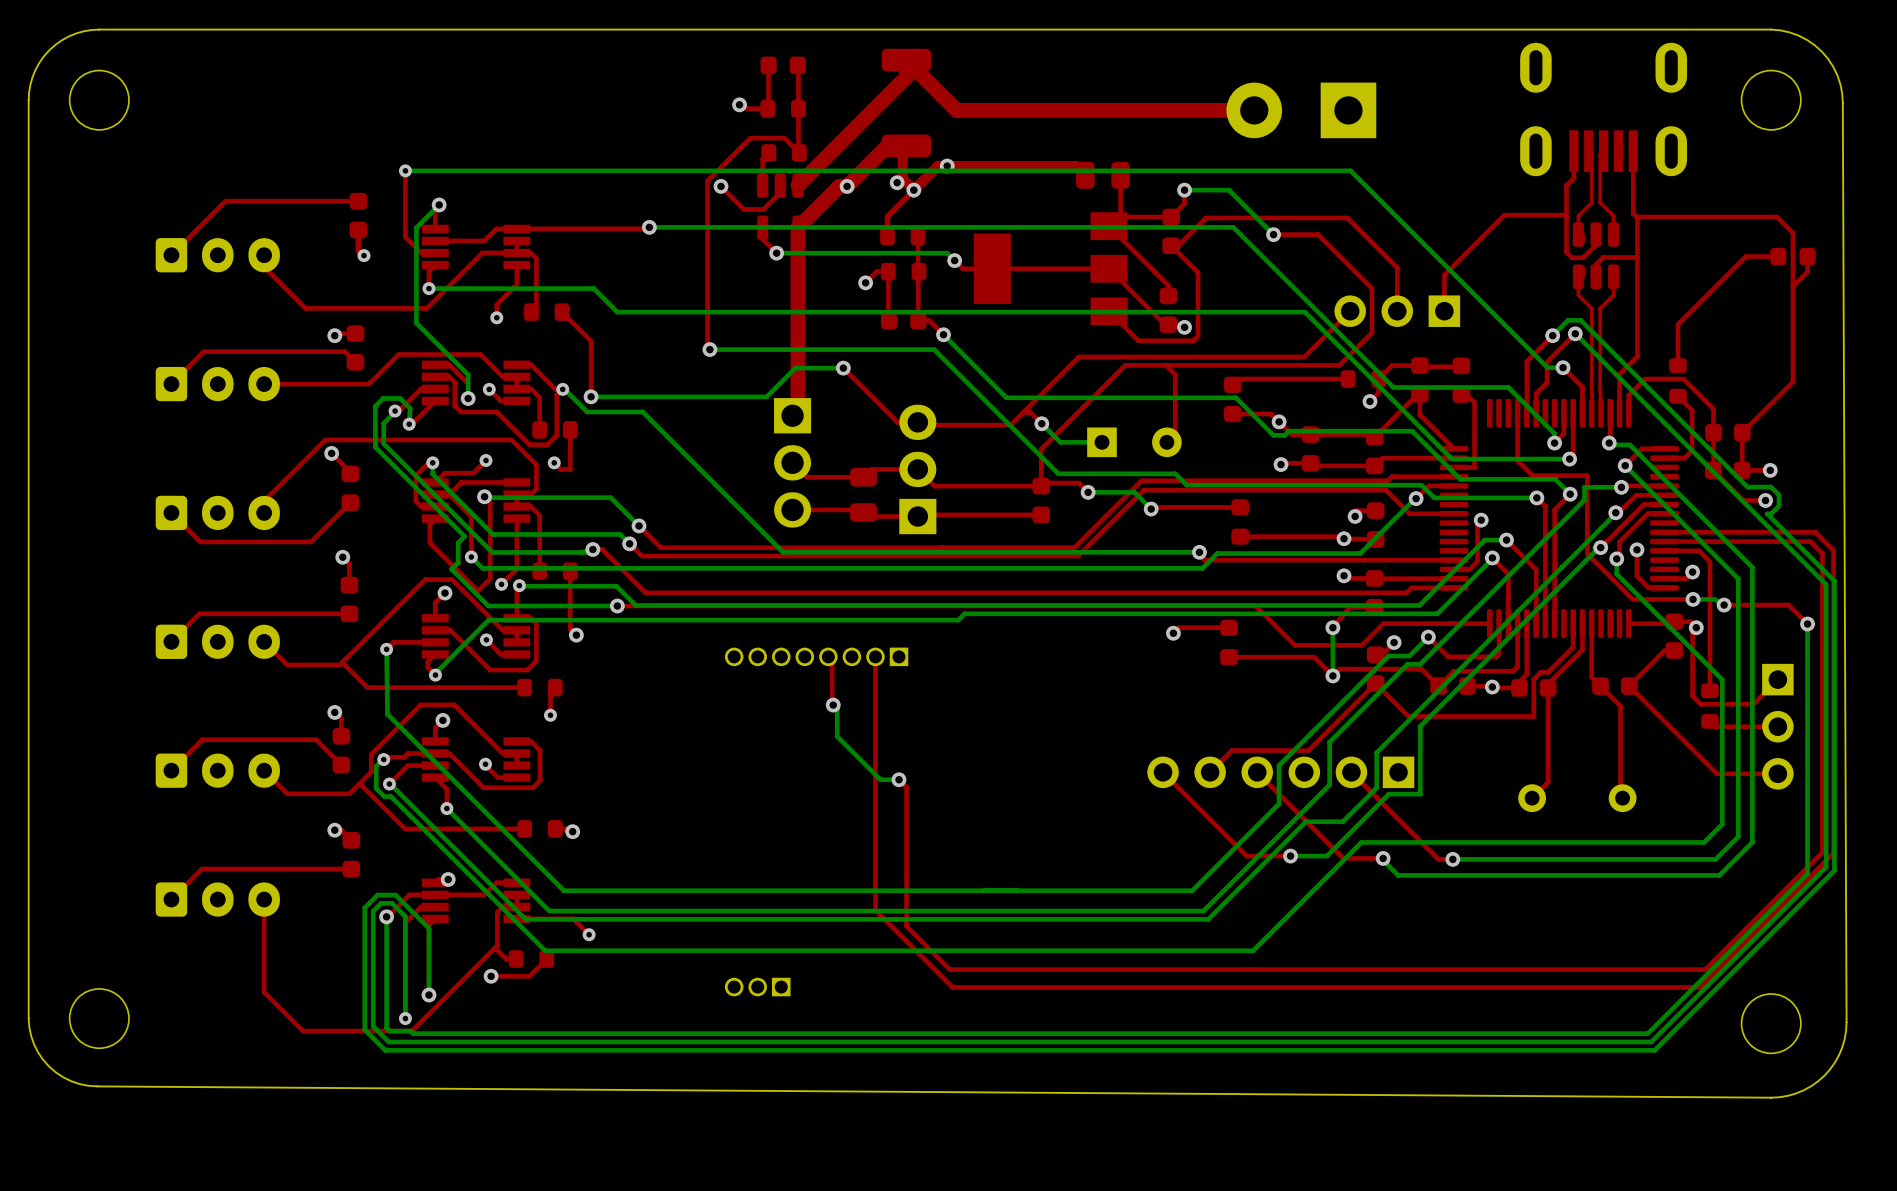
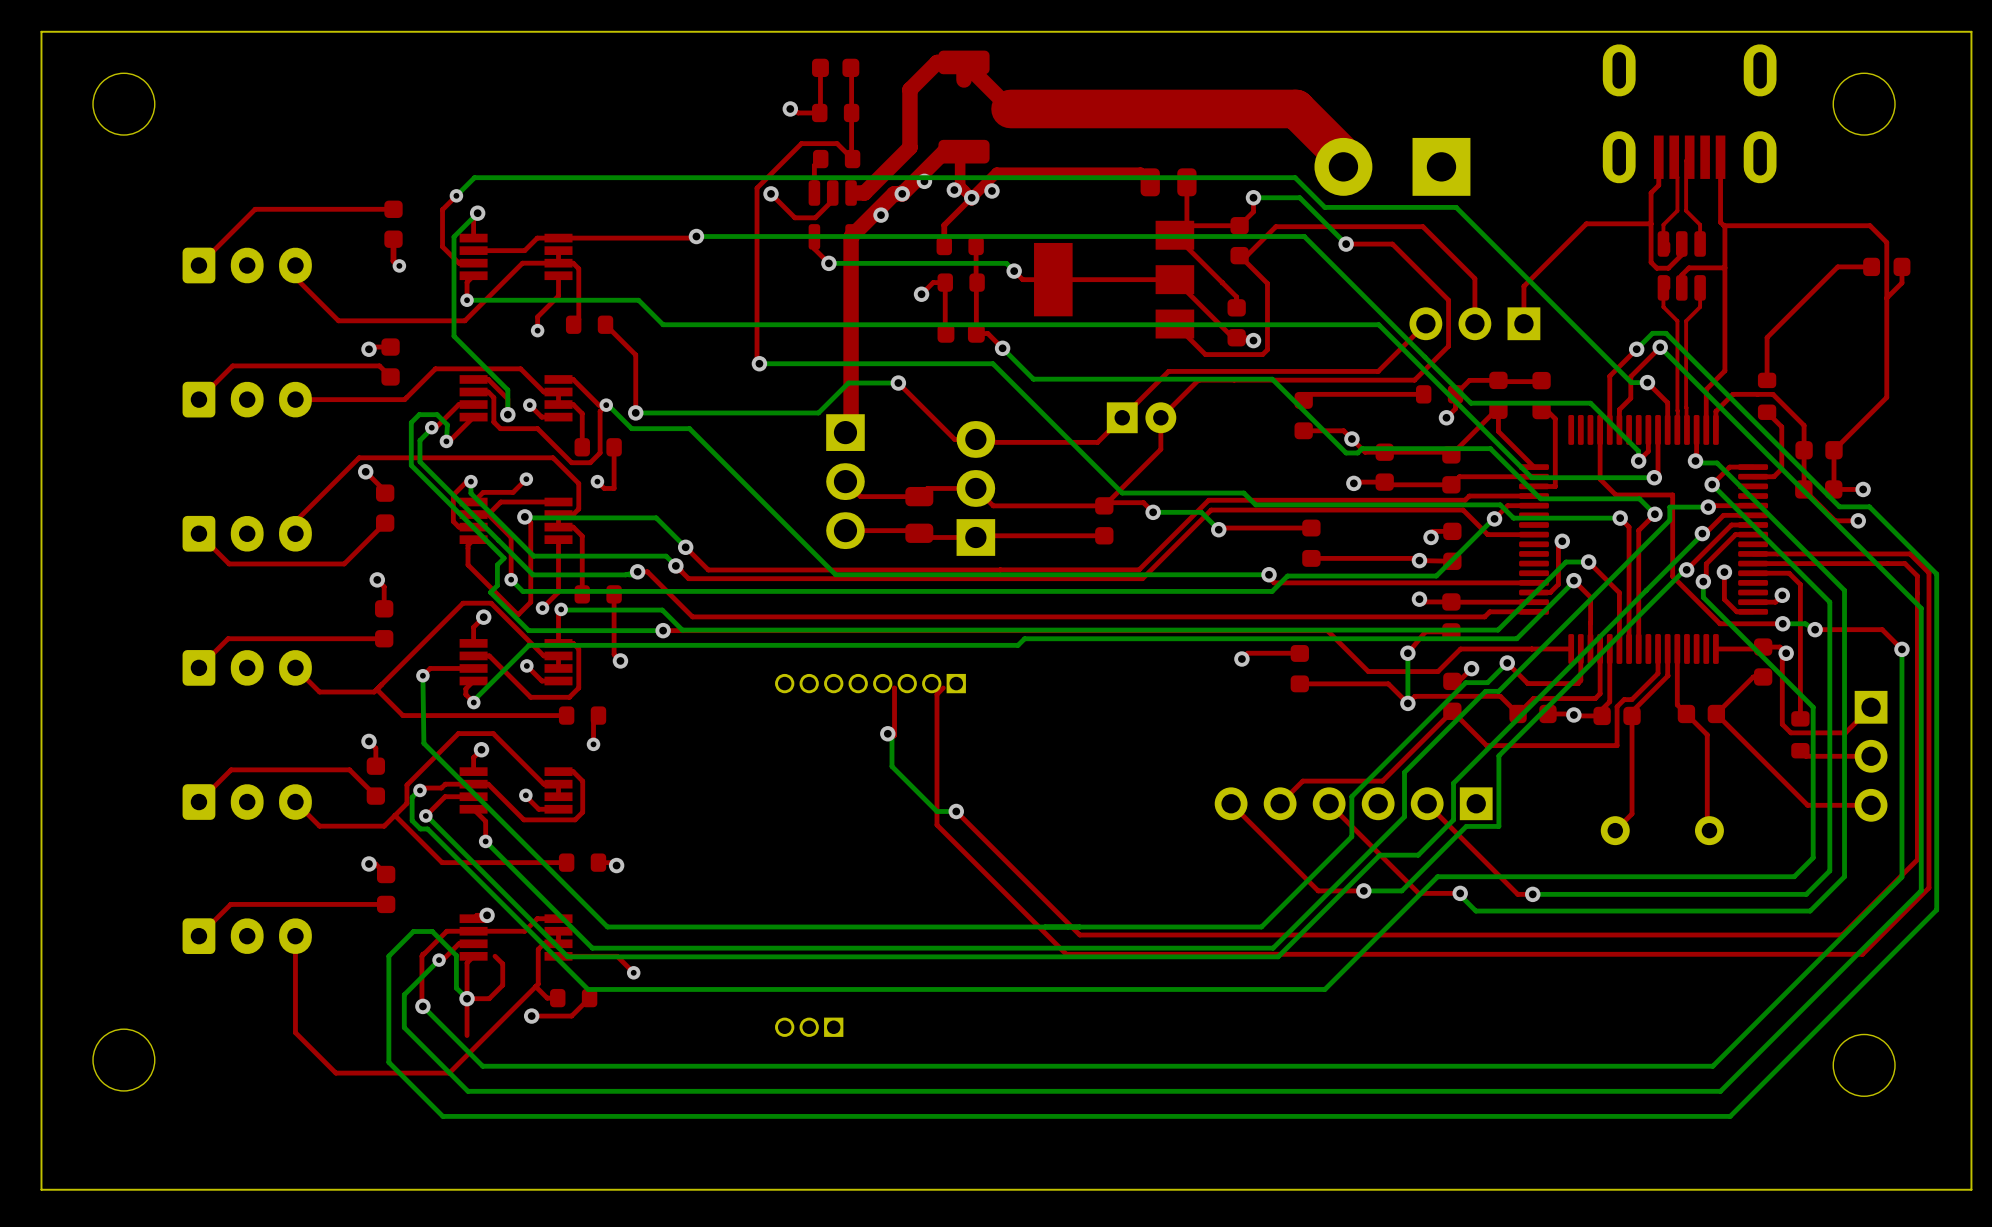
board edge: (1771, 29) (99, 29) (83, 31) (61, 40) (49, 50) (39, 62) (32, 76) (28, 100) (28, 1018) (31, 1036) (38, 1052) (49, 1066) (63, 1077) (79, 1084) (97, 1086) (1771, 1097) (1796, 1093) (1811, 1086) (1824, 1075) (1835, 1062) (1842, 1047) (1846, 1022) (1842, 103) (1837, 75) (1821, 51) (1798, 35) (1771, 29) -> (1971, 31) (1971, 1189) (41, 1189) (41, 31) (1971, 31)
top track: none -> (964, 62) (937, 62) (909, 89) (909, 147) (864, 193) (854, 193)
top track: (906, 77) (797, 185) -> none
top track: (951, 104) (956, 110) (1254, 110) -> (1010, 108) (1295, 108) (1343, 156) (1343, 166)
part position: (1301, 110) -> (1392, 166)
via position: (947, 166) -> (991, 191)
top track: (405, 170) (405, 201) -> (456, 195) (442, 209)
via position: (405, 170) -> (456, 195)
bottom track: (436, 170) (405, 170) -> (474, 177) (456, 195)
bottom track: (1224, 170) (1350, 170) (1379, 199) -> (1295, 177) (1324, 207) (1456, 207)
via: none -> (924, 181)
via: none -> (881, 215)
top track: (1102, 357) (1078, 357) (1010, 425) -> (1168, 371) (1097, 442) (1072, 442)
bottom track: (973, 364) (1006, 397) (1236, 397) -> (1033, 379) (1272, 379) (1307, 413)
top track: (1131, 365) (1125, 365) (1041, 449) (1041, 486) -> (1198, 380) (1160, 417) (1160, 449) (1107, 502)
top track: (1166, 365) (1175, 374) (1175, 439) (1166, 447) -> none
part: none -> (1141, 417)
top track: (1023, 412) (1030, 412) (1041, 423) -> none
bottom track: (1041, 423) (1060, 442) (1102, 442) -> none
via: (1041, 423) -> none
part: (1134, 442) -> none
bottom track: (1771, 487) (1779, 494) (1779, 506) (1771, 513) (1767, 513) (1834, 581) (1834, 870) (1654, 1050) (385, 1050) (364, 1029) (364, 907) -> (1864, 506) (1869, 506) (1936, 574) (1936, 909) (1730, 1116) (442, 1116) (388, 1062) (388, 956) (400, 944)
top track: (832, 656) (833, 705) -> none
top track: (875, 656) (875, 910) (952, 987) (1699, 987) (1769, 916) -> (943, 687) (936, 694) (936, 824) (1066, 954) (1862, 954)
top track: none -> (894, 688) (894, 735) (891, 737)
top track: (906, 787) (906, 926) (949, 969) (1705, 969) (1822, 852) (1822, 826) -> (964, 819) (1079, 935) (1842, 935) (1917, 859)
bottom track: (1807, 842) (1807, 873) (1647, 1033) (413, 1033) (410, 1031) (389, 1031) (386, 1027) (386, 916) -> (1901, 877) (1712, 1066) (482, 1066) (422, 1006)
bottom track: (1826, 855) (1826, 867) (1651, 1041) (388, 1041) (373, 1026) (373, 911) (381, 903) (392, 903) (405, 916) (405, 1018) -> (1921, 890) (1720, 1091) (468, 1091) (404, 1027) (404, 994) (439, 960)
via: (386, 916) -> none
top track: none -> (421, 956) (422, 1006)
bottom track: (418, 918) (428, 928) (428, 995) -> (456, 955) (456, 988) (467, 998)
top track: none -> (495, 956) (502, 963) (502, 985) (489, 998) (467, 998)
via: none -> (467, 998)
via: none -> (422, 1006)
via: (428, 995) -> none
via position: (405, 1018) -> (439, 960)

